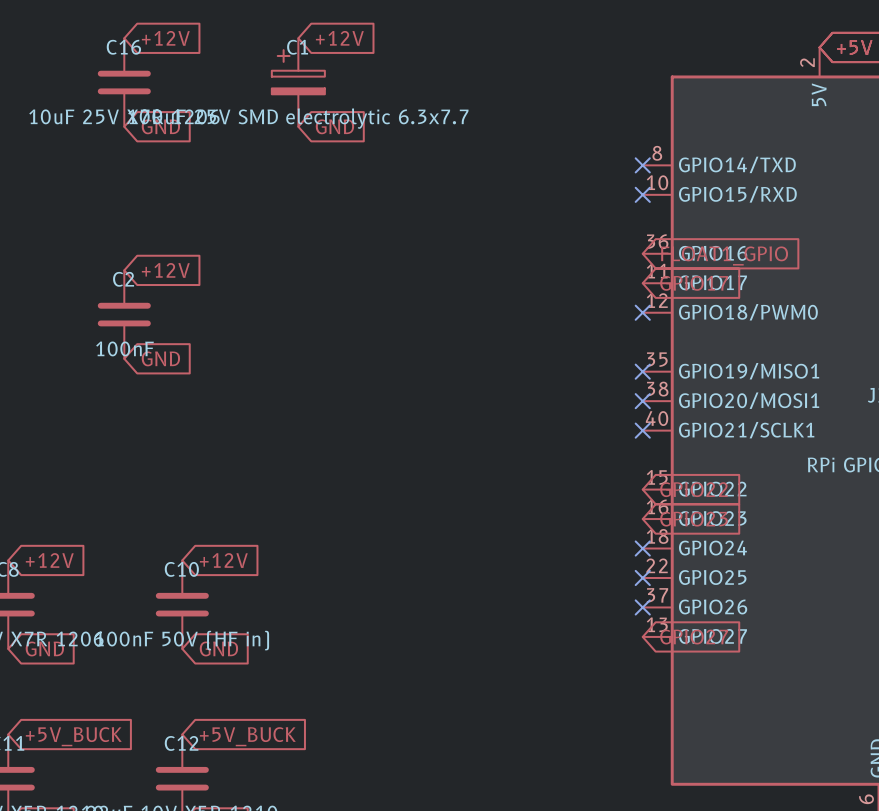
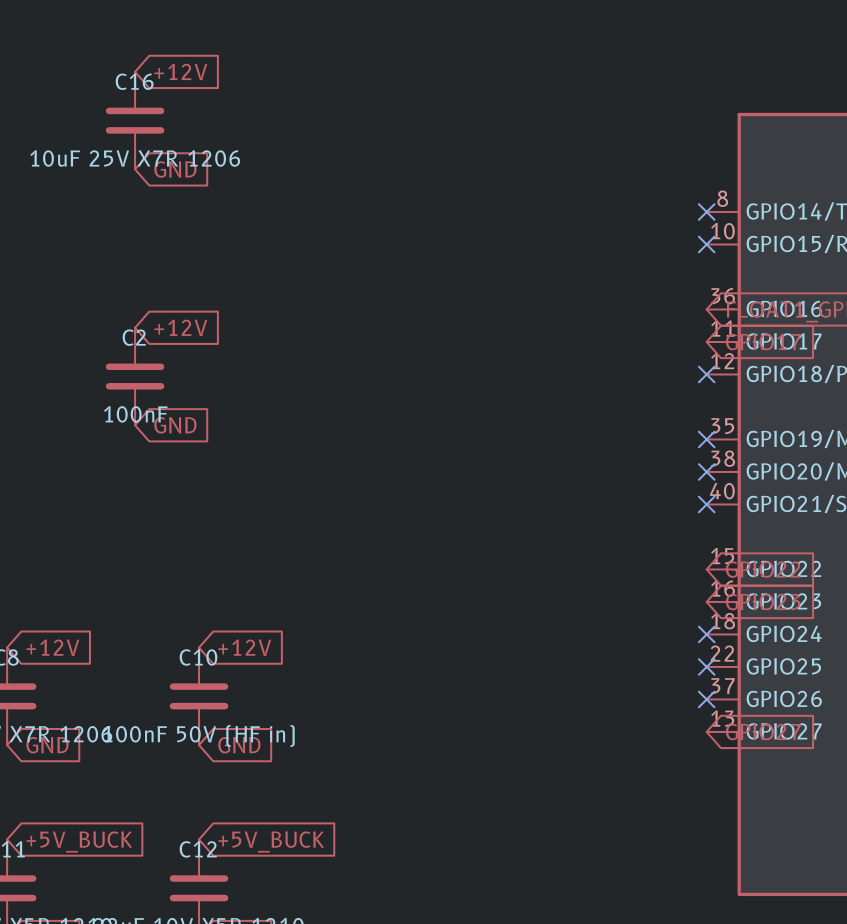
global label: +12V (339, 38) -> none
C1: 100uF 25V SMD electrolytic 6.3x7.7 (298, 82) -> none
global label: GND (334, 126) -> none

